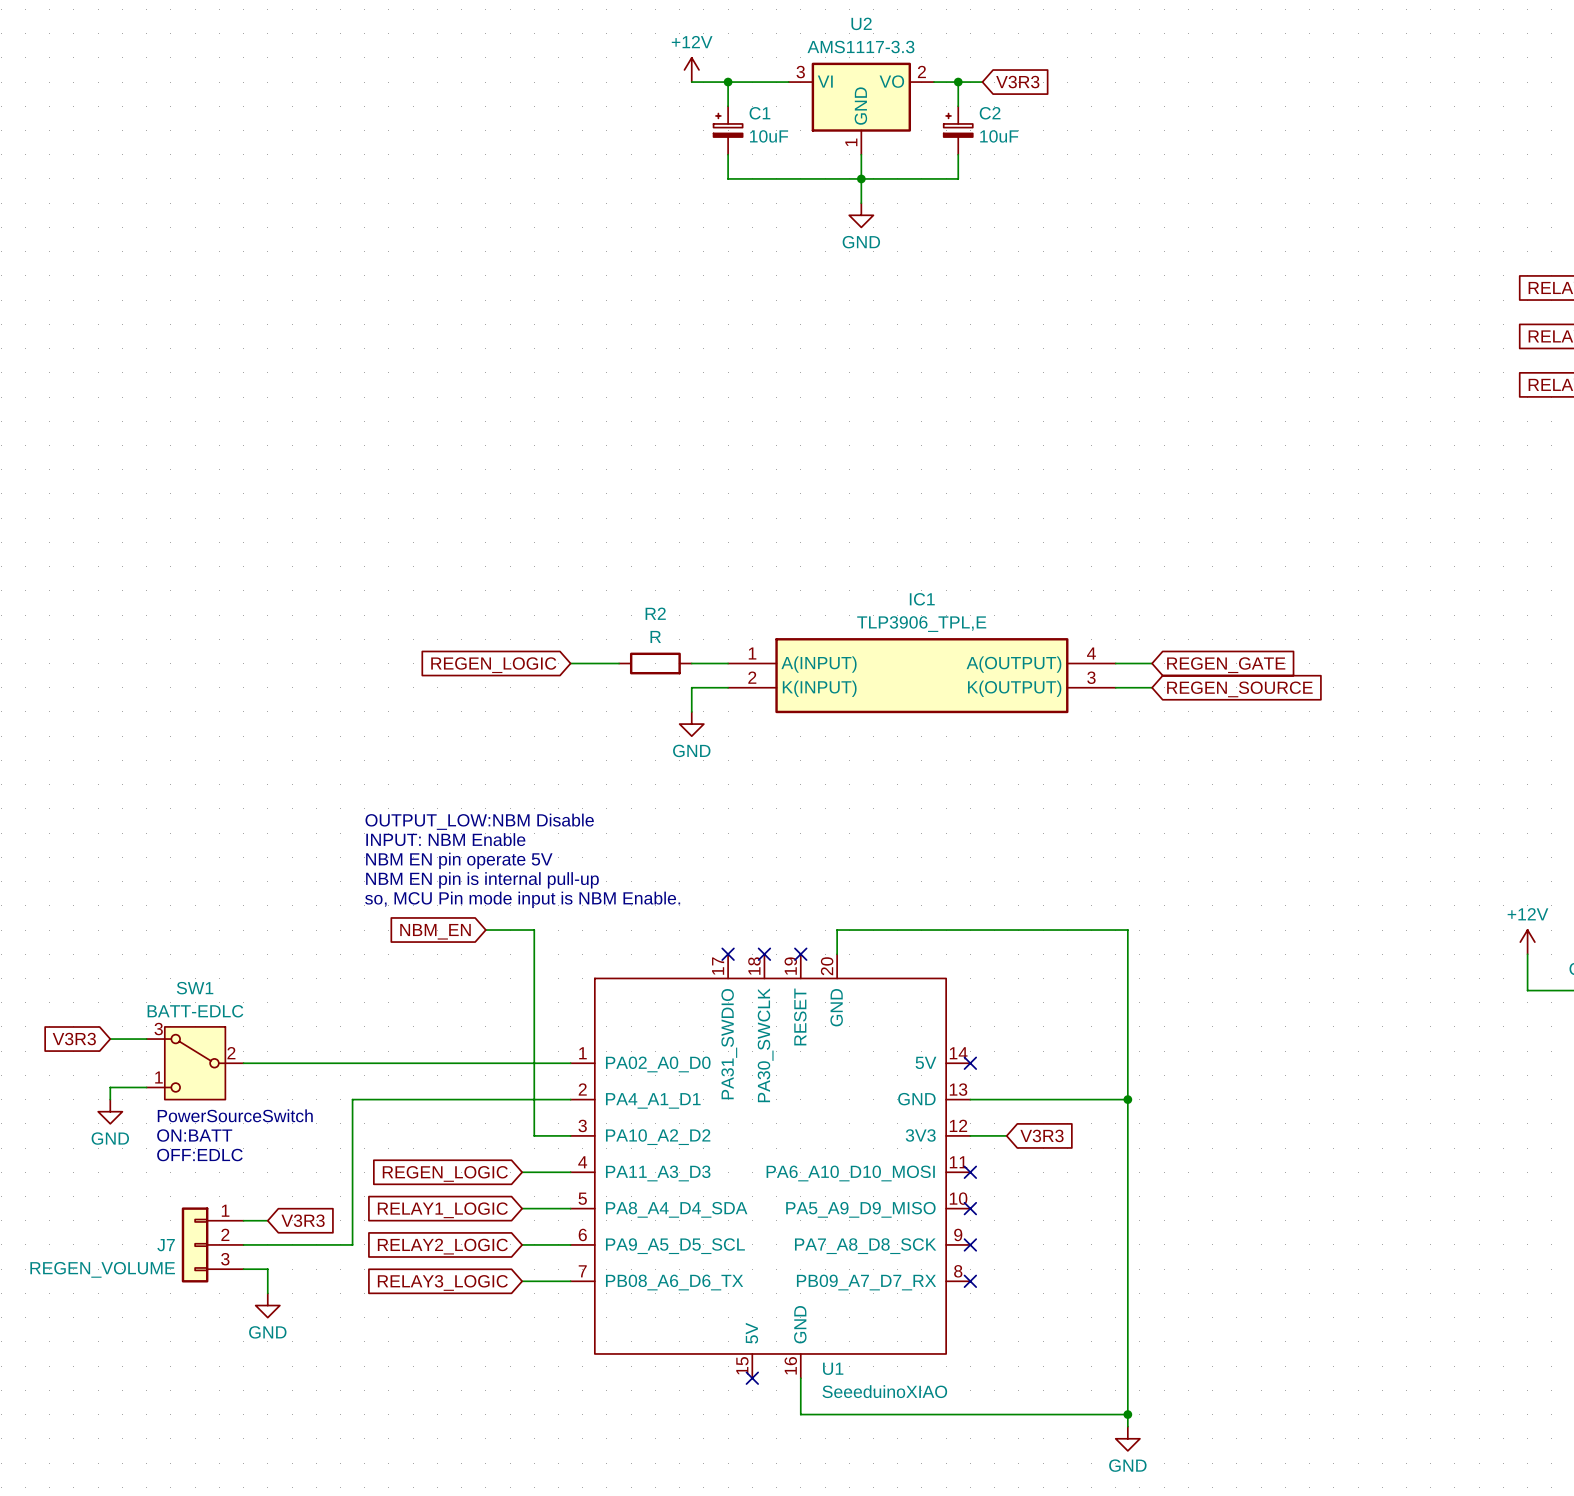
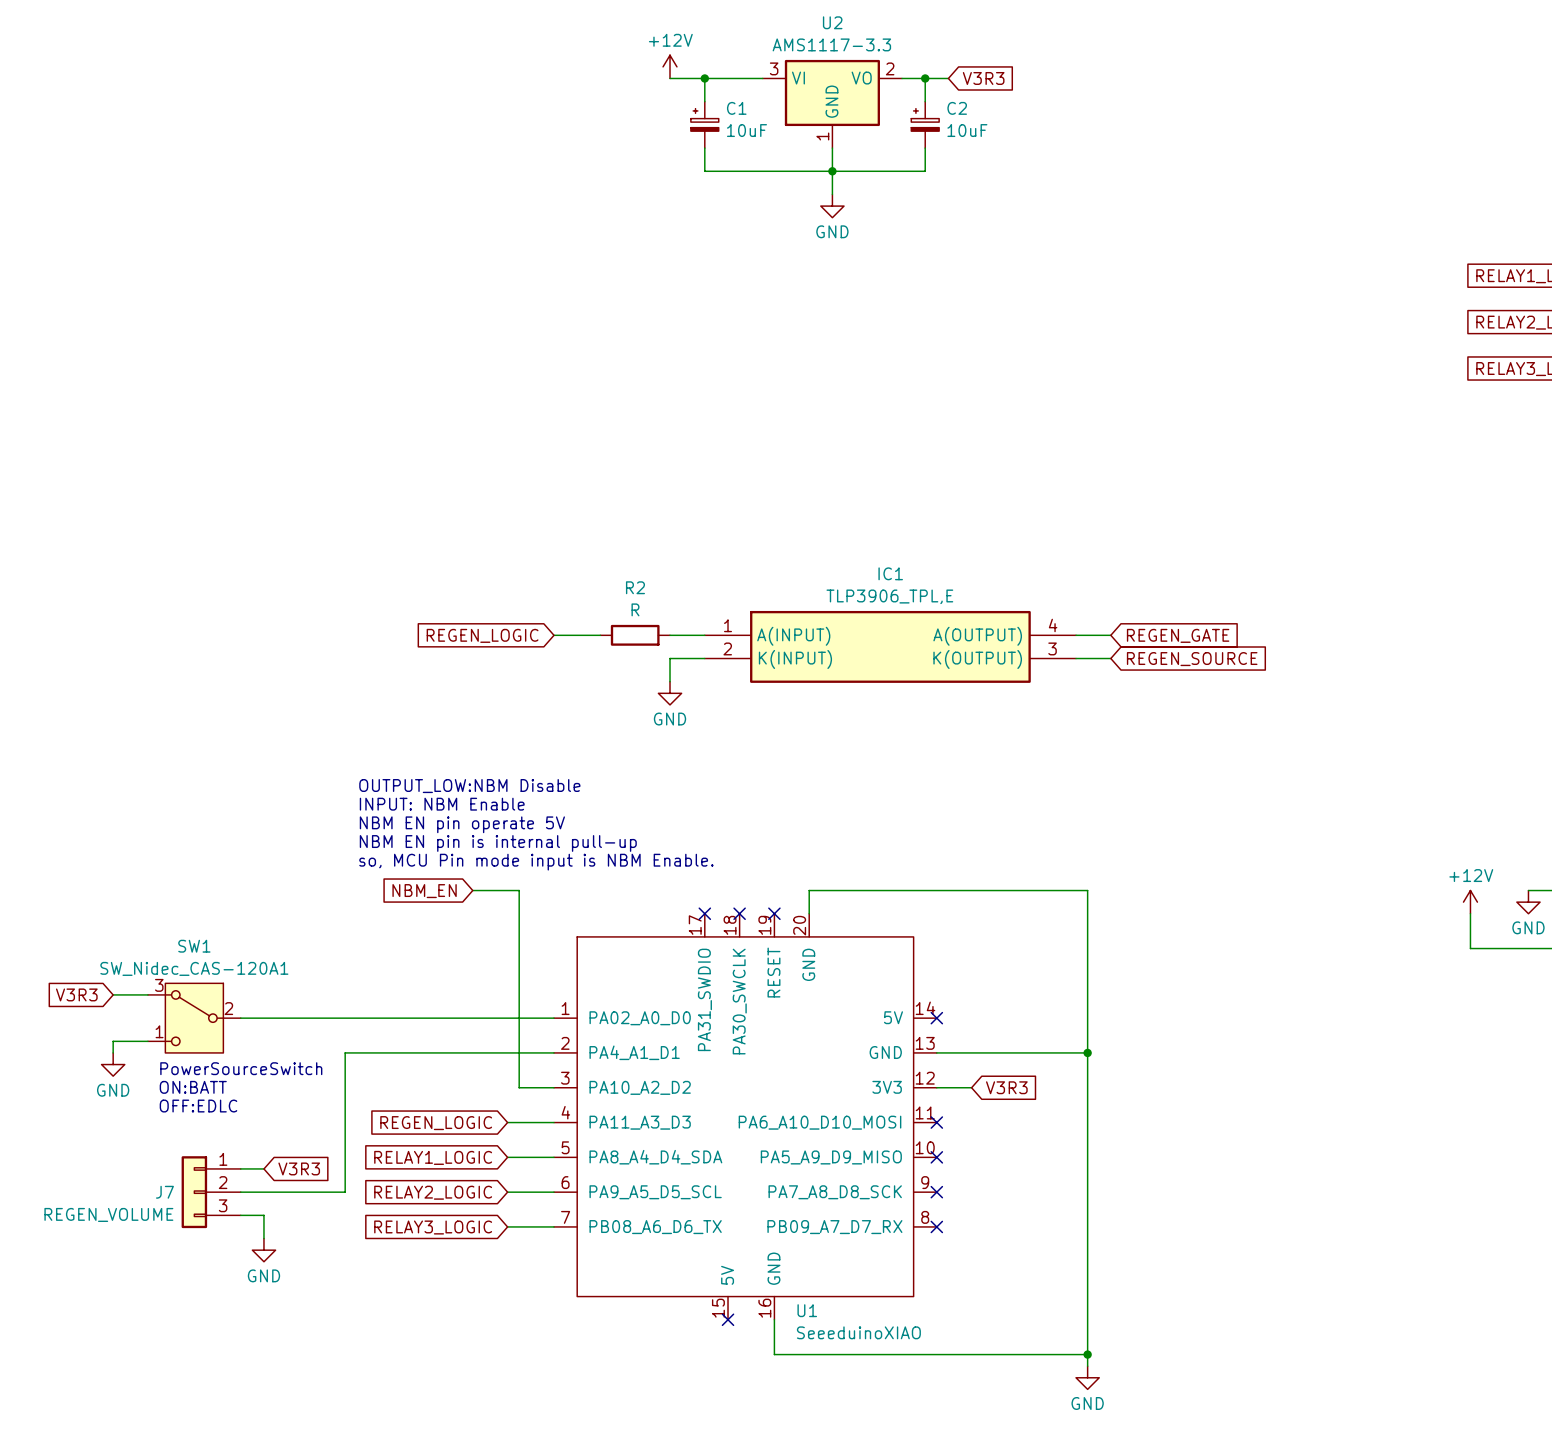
SW1 value: BATT-EDLC (195, 1011) -> SW_Nidec_CAS-120A1 (194, 968)

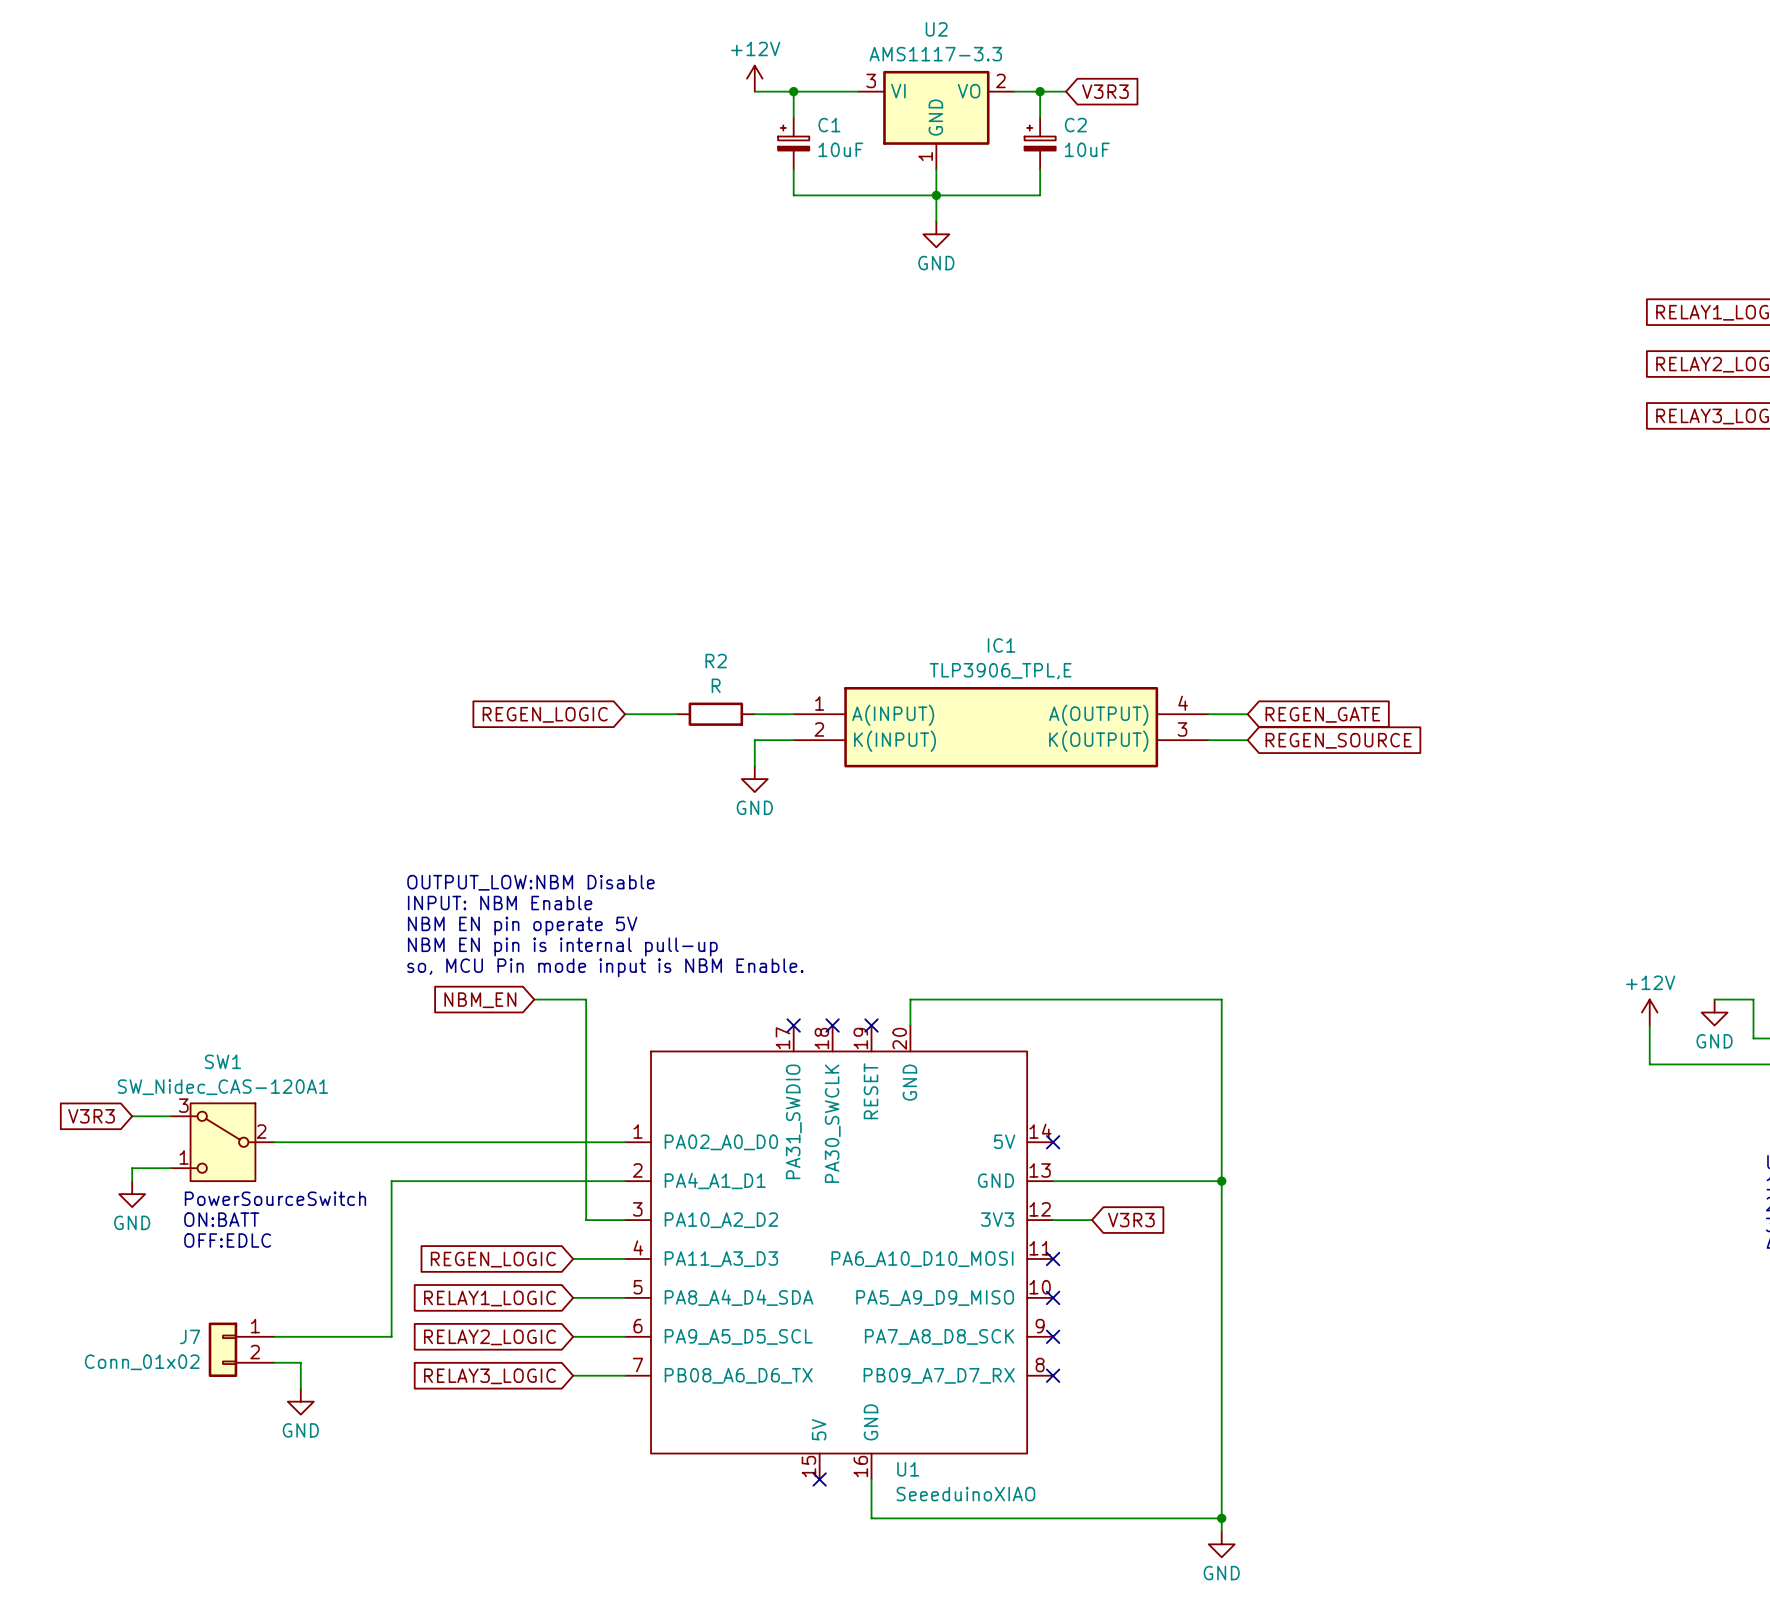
J7 symbol: [181, 1156, 241, 1229] -> [208, 1322, 275, 1378]
wire: (240, 1168) (263, 1168) -> none
global label: V3R3 (299, 1168) -> none
J7 value: REGEN_VOLUME (108, 1214) -> Conn_01x02 (142, 1362)

